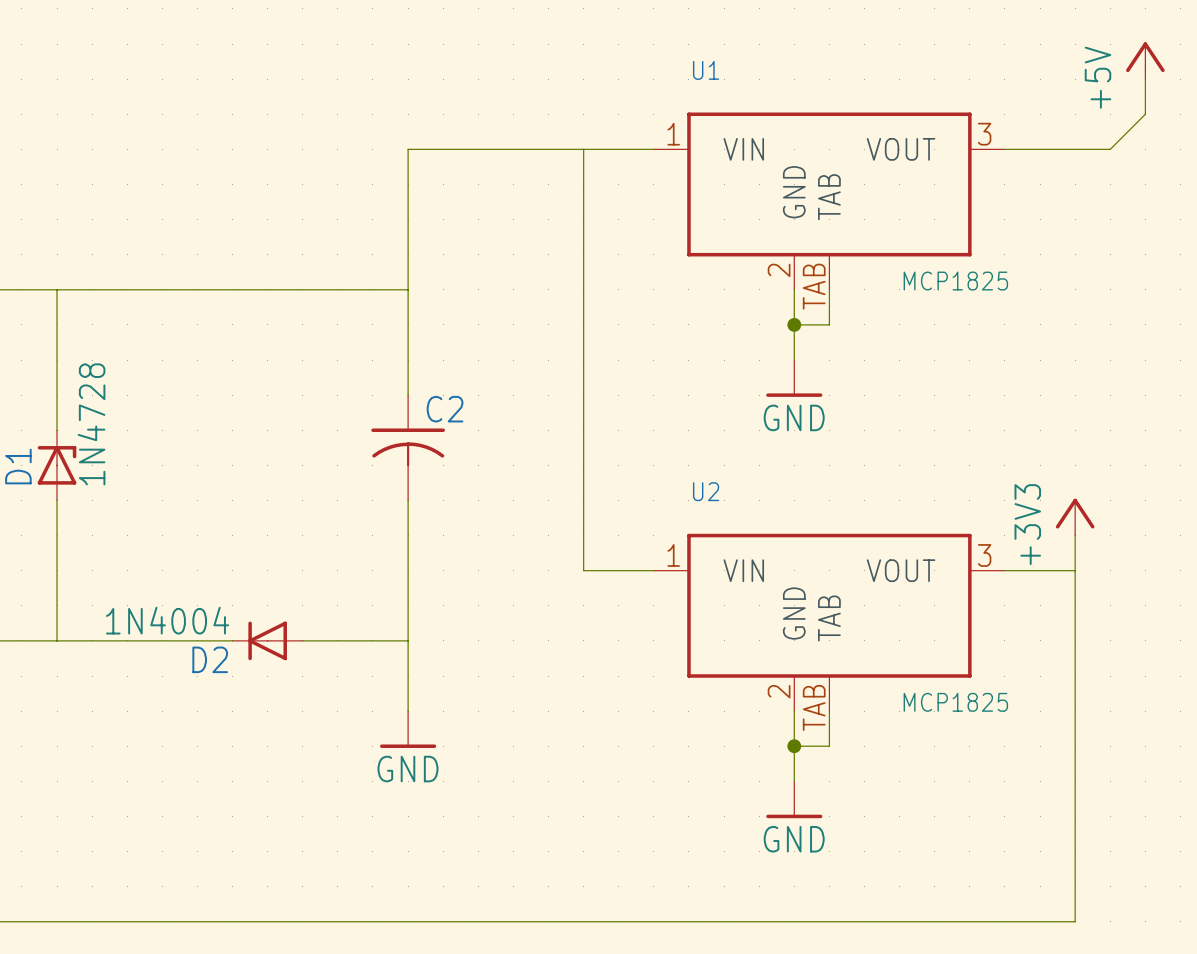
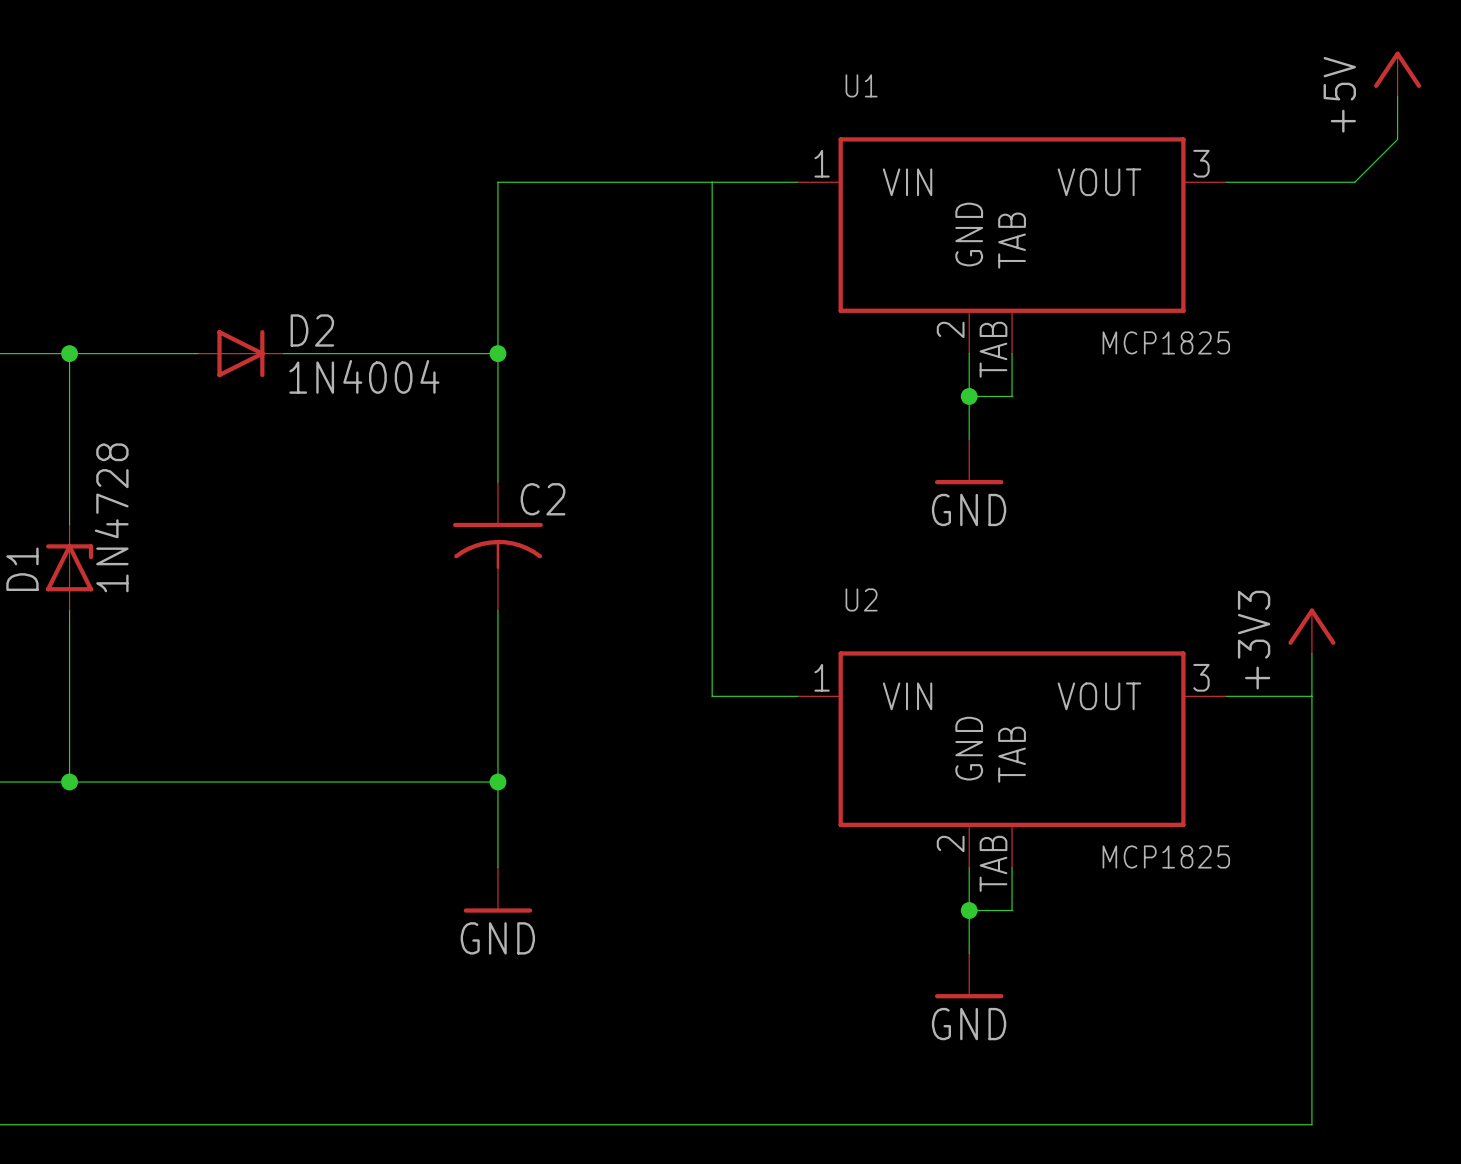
junction: none -> (69, 353)
junction: none -> (497, 353)
junction: none -> (69, 782)
D2 rotation: 0° (267, 640) -> 180° (240, 353)
D2 position: (267, 640) -> (240, 353)
junction: none -> (497, 782)

